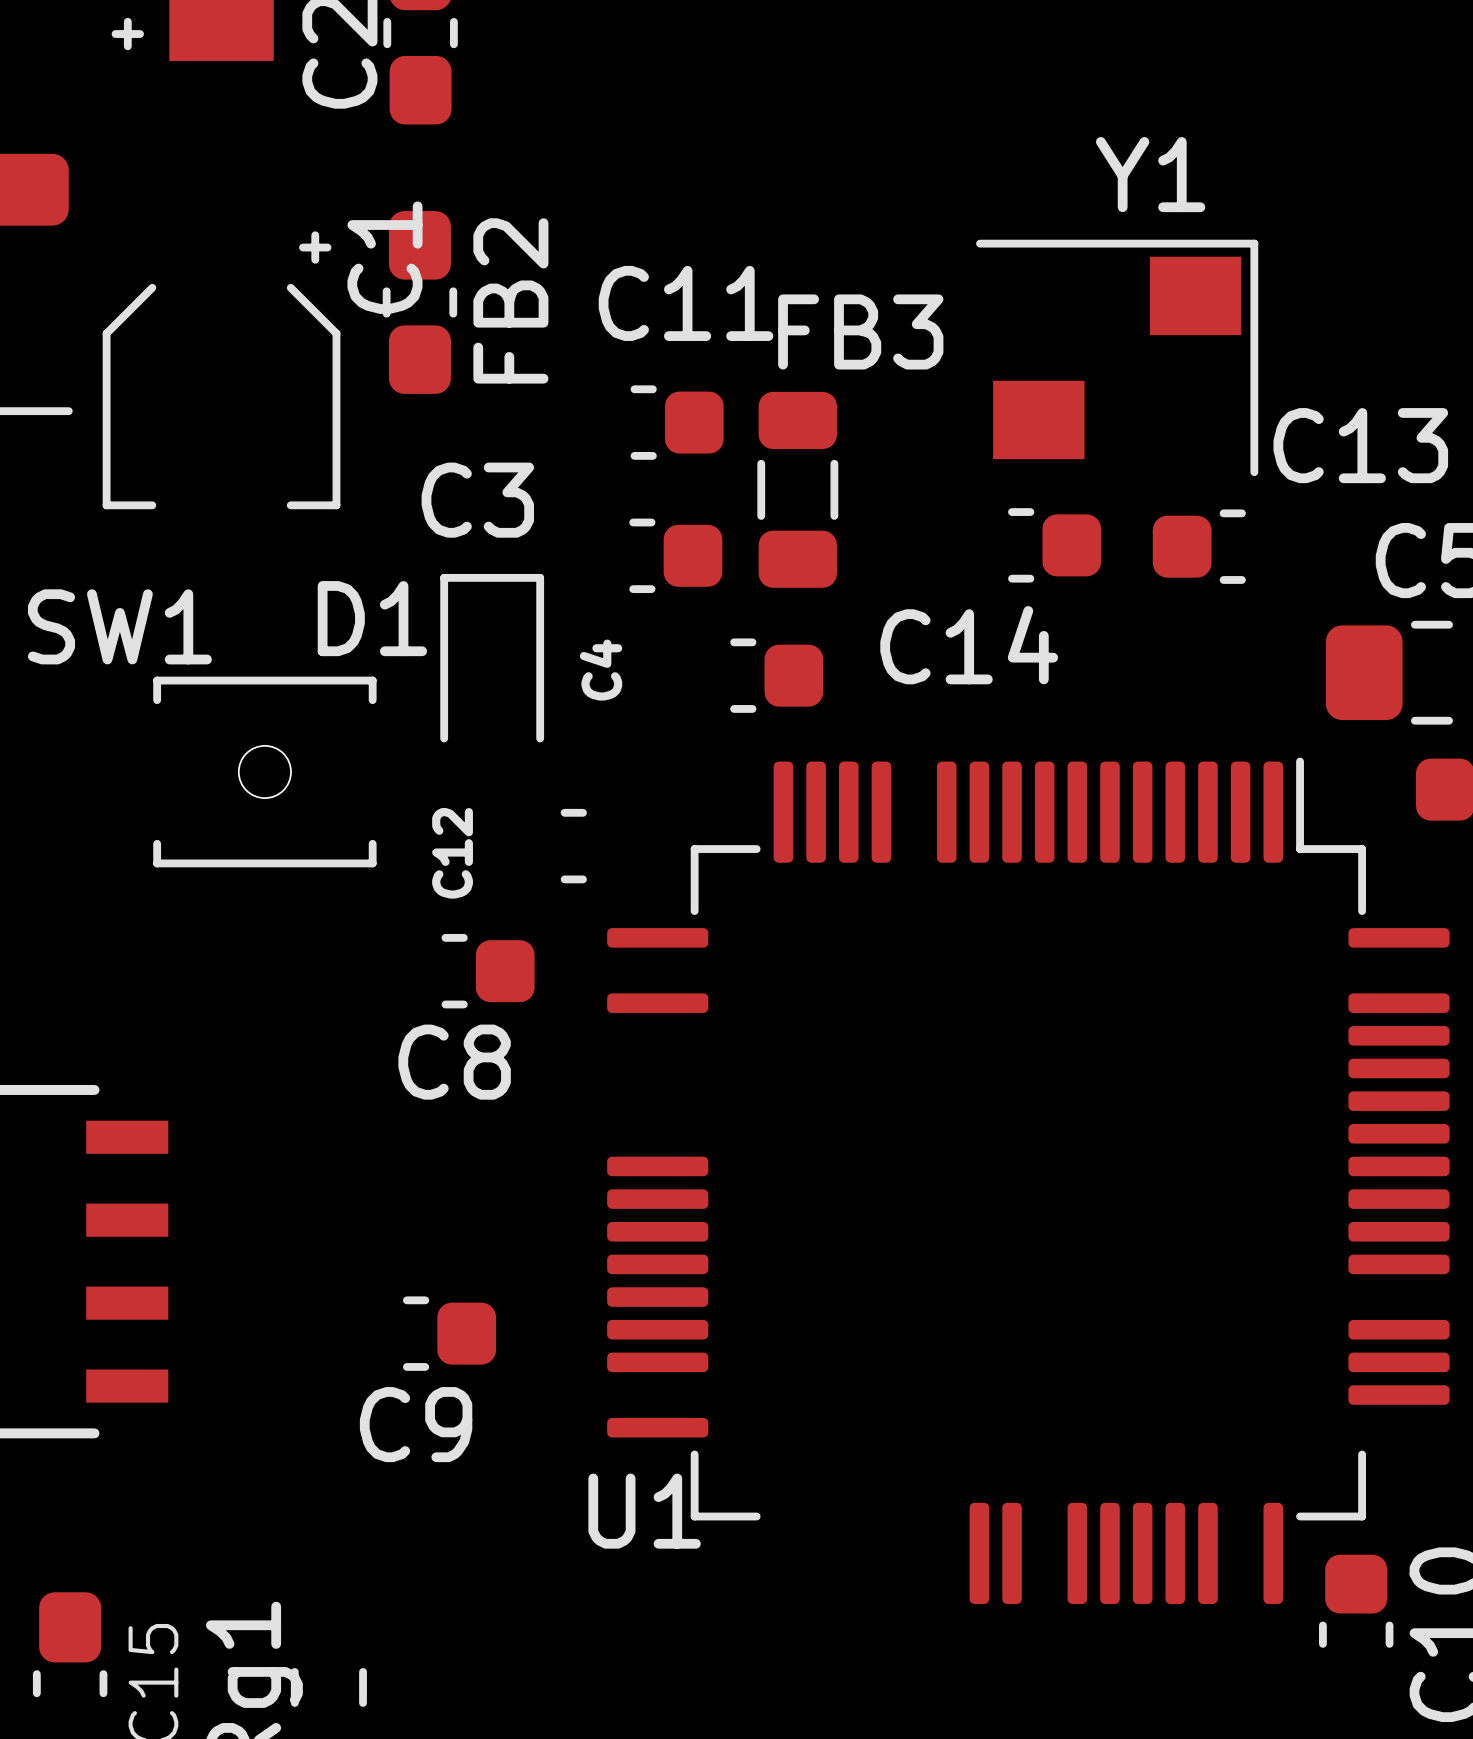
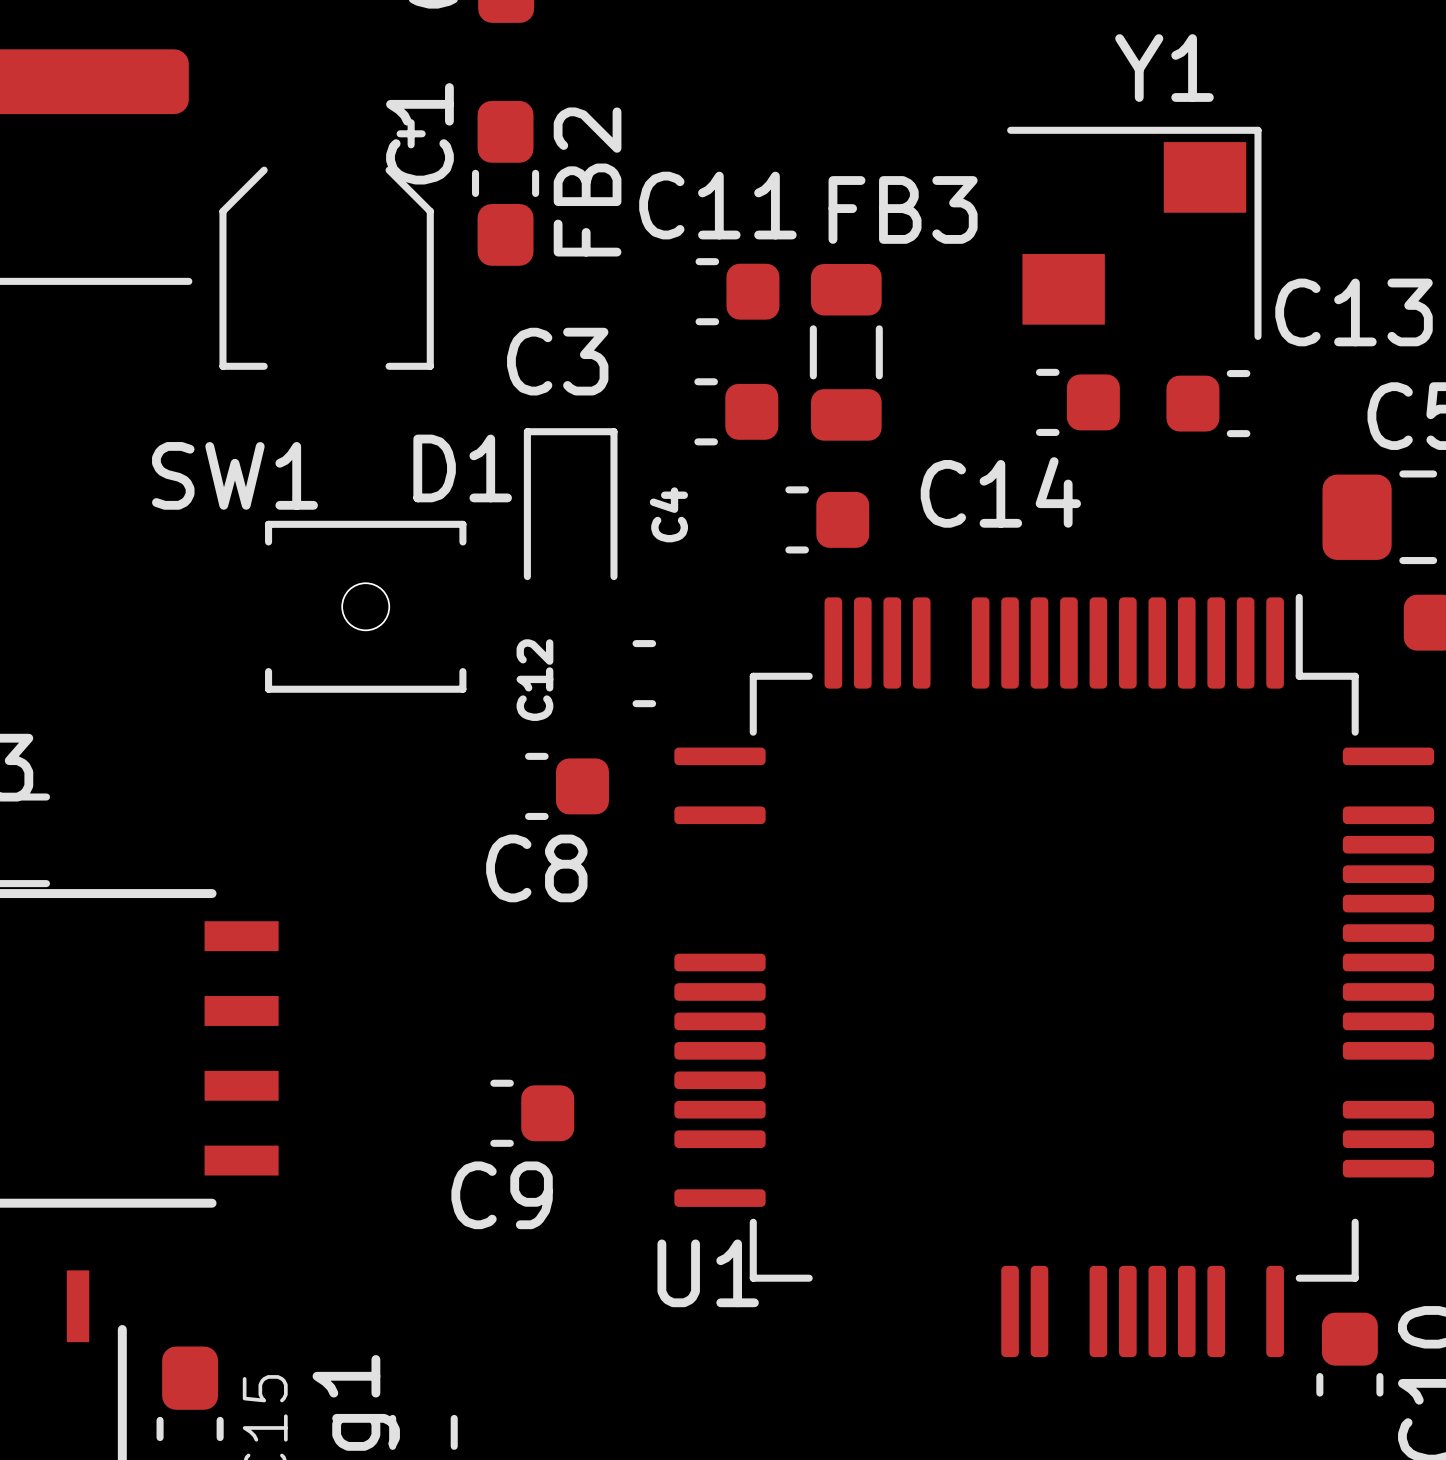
C1 name position: C1 (384, 257) -> C1 (419, 133)
C11 name position: C11 (686, 303) -> C11 (717, 205)

